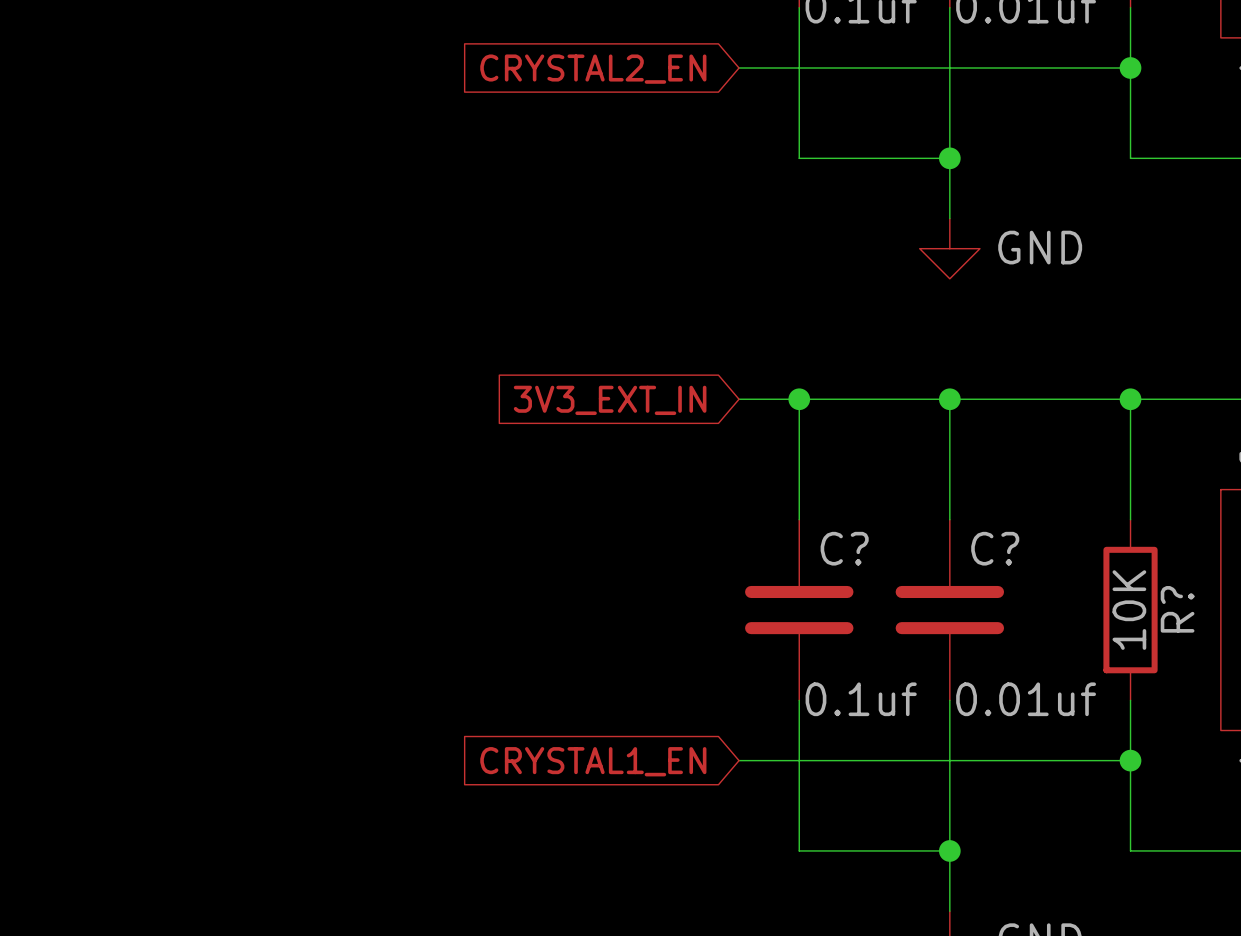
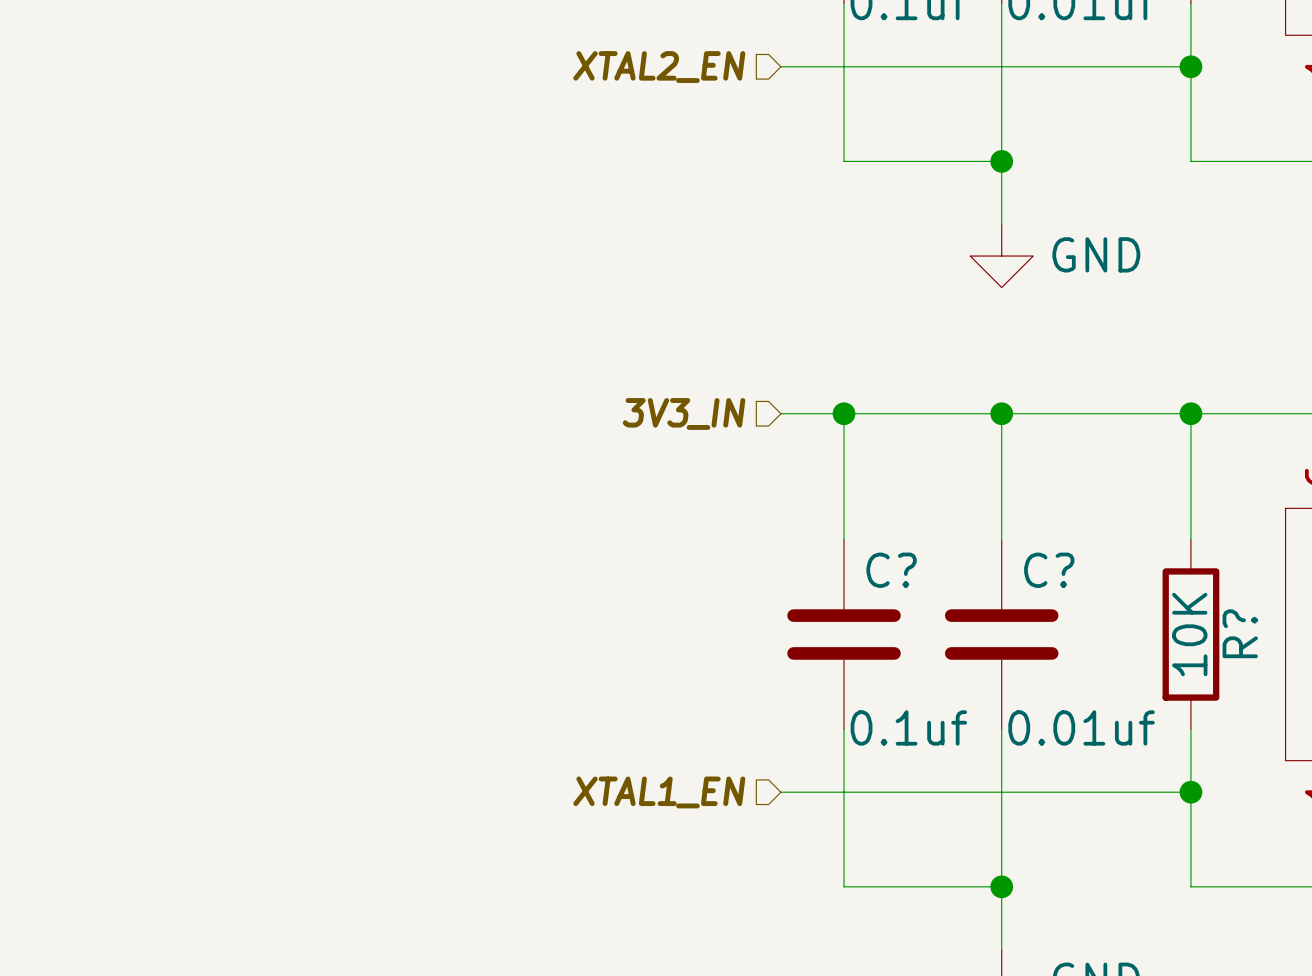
hierarchical label: none -> XTAL2_EN (659, 67)
global label: CRYSTAL2_EN (593, 69) -> none
hierarchical label: none -> 3V3_IN (684, 413)
global label: 3V3_EXT_IN (610, 400) -> none
hierarchical label: none -> XTAL1_EN (659, 792)
global label: CRYSTAL1_EN (593, 761) -> none

